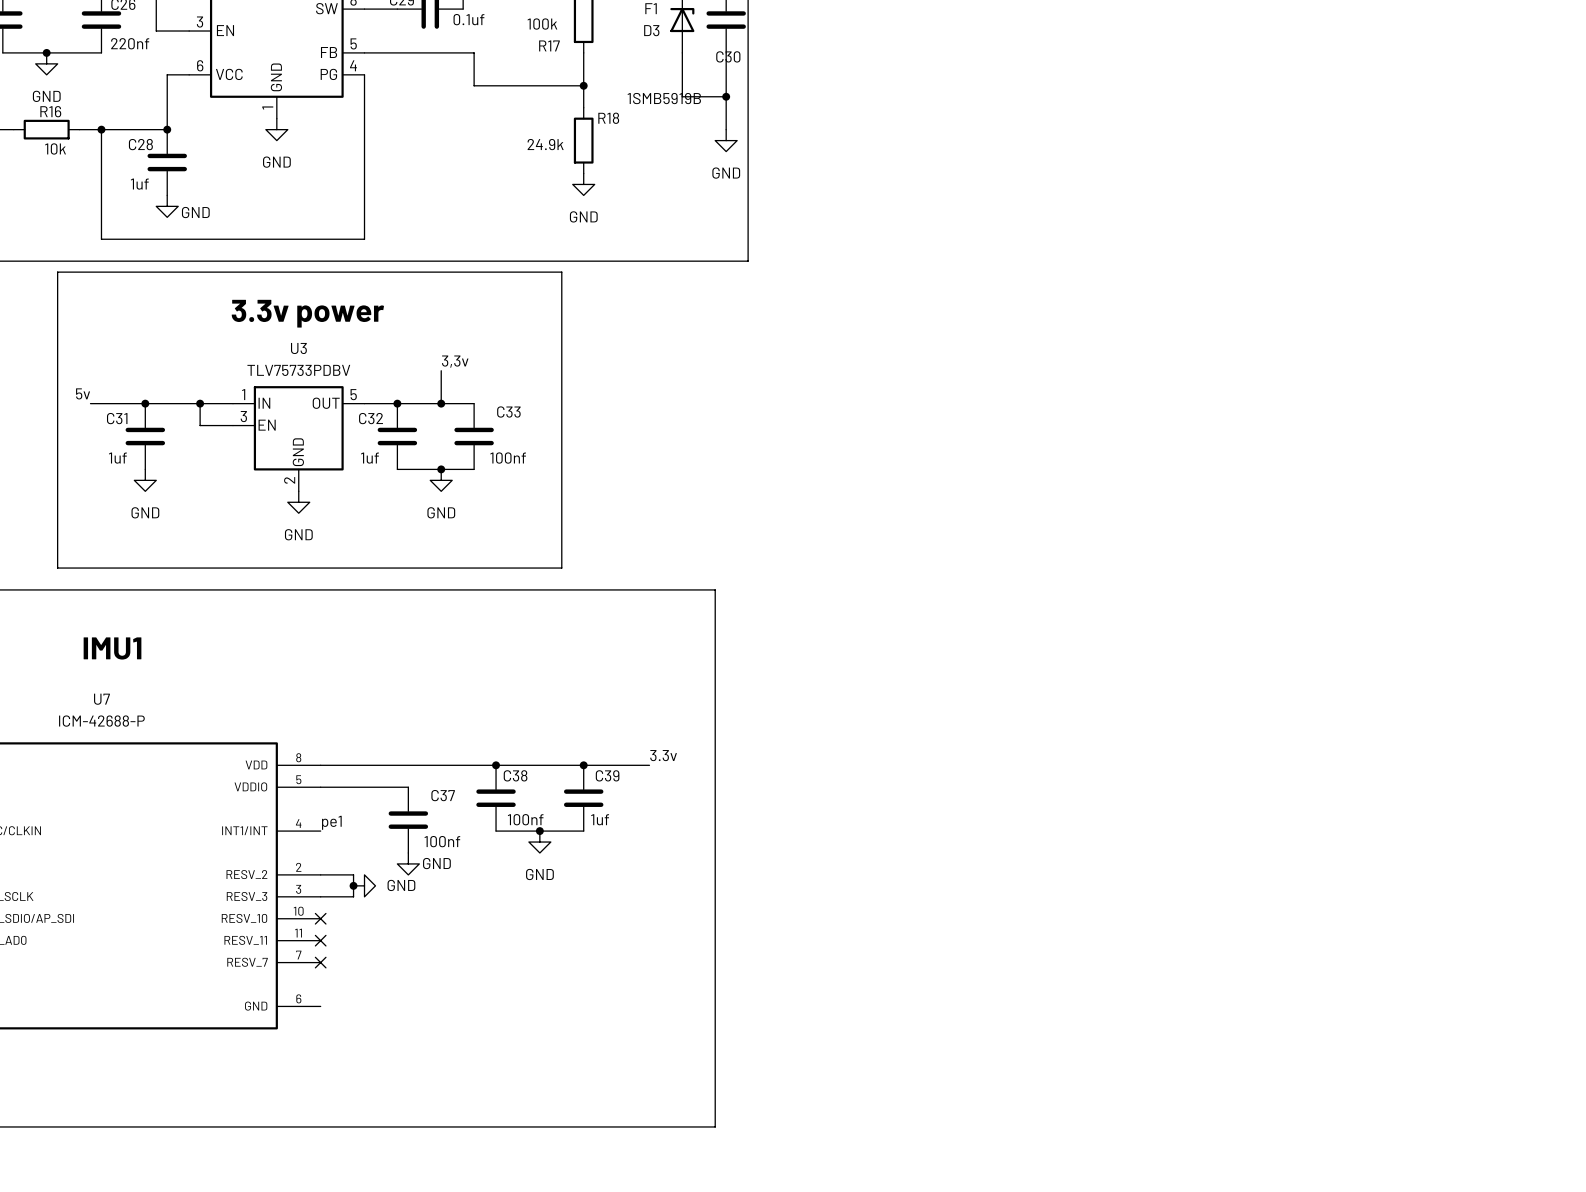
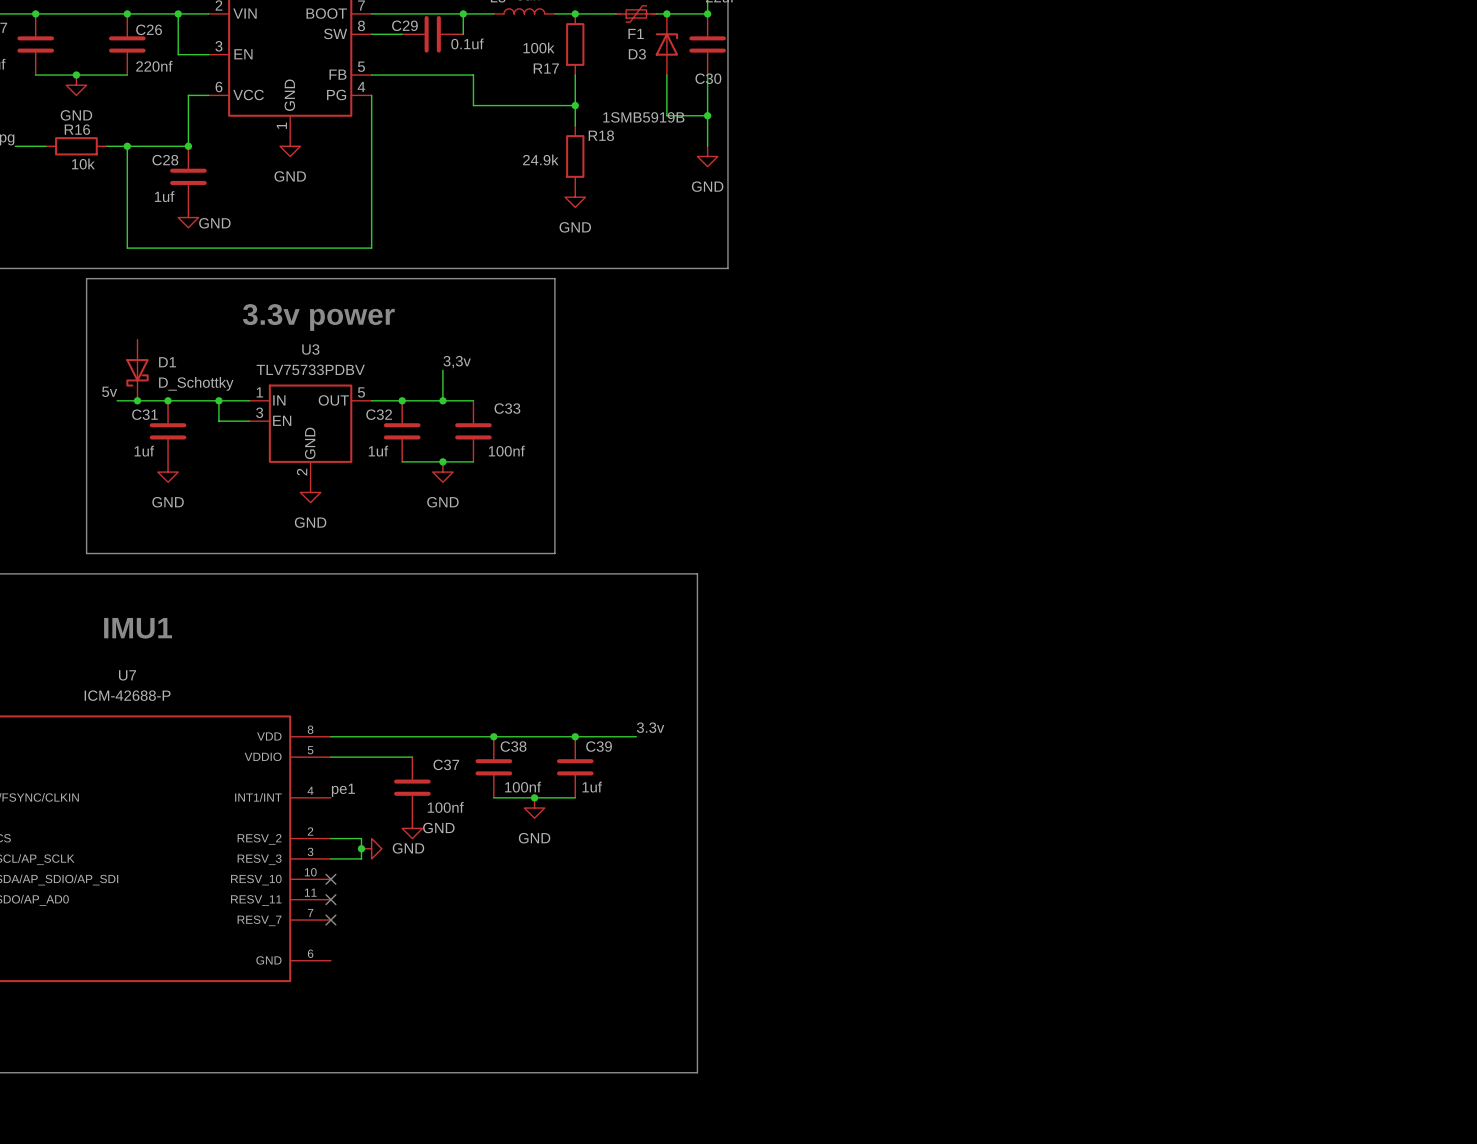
D1: none -> D_Schottky (137, 370)
junction: none -> (137, 400)

